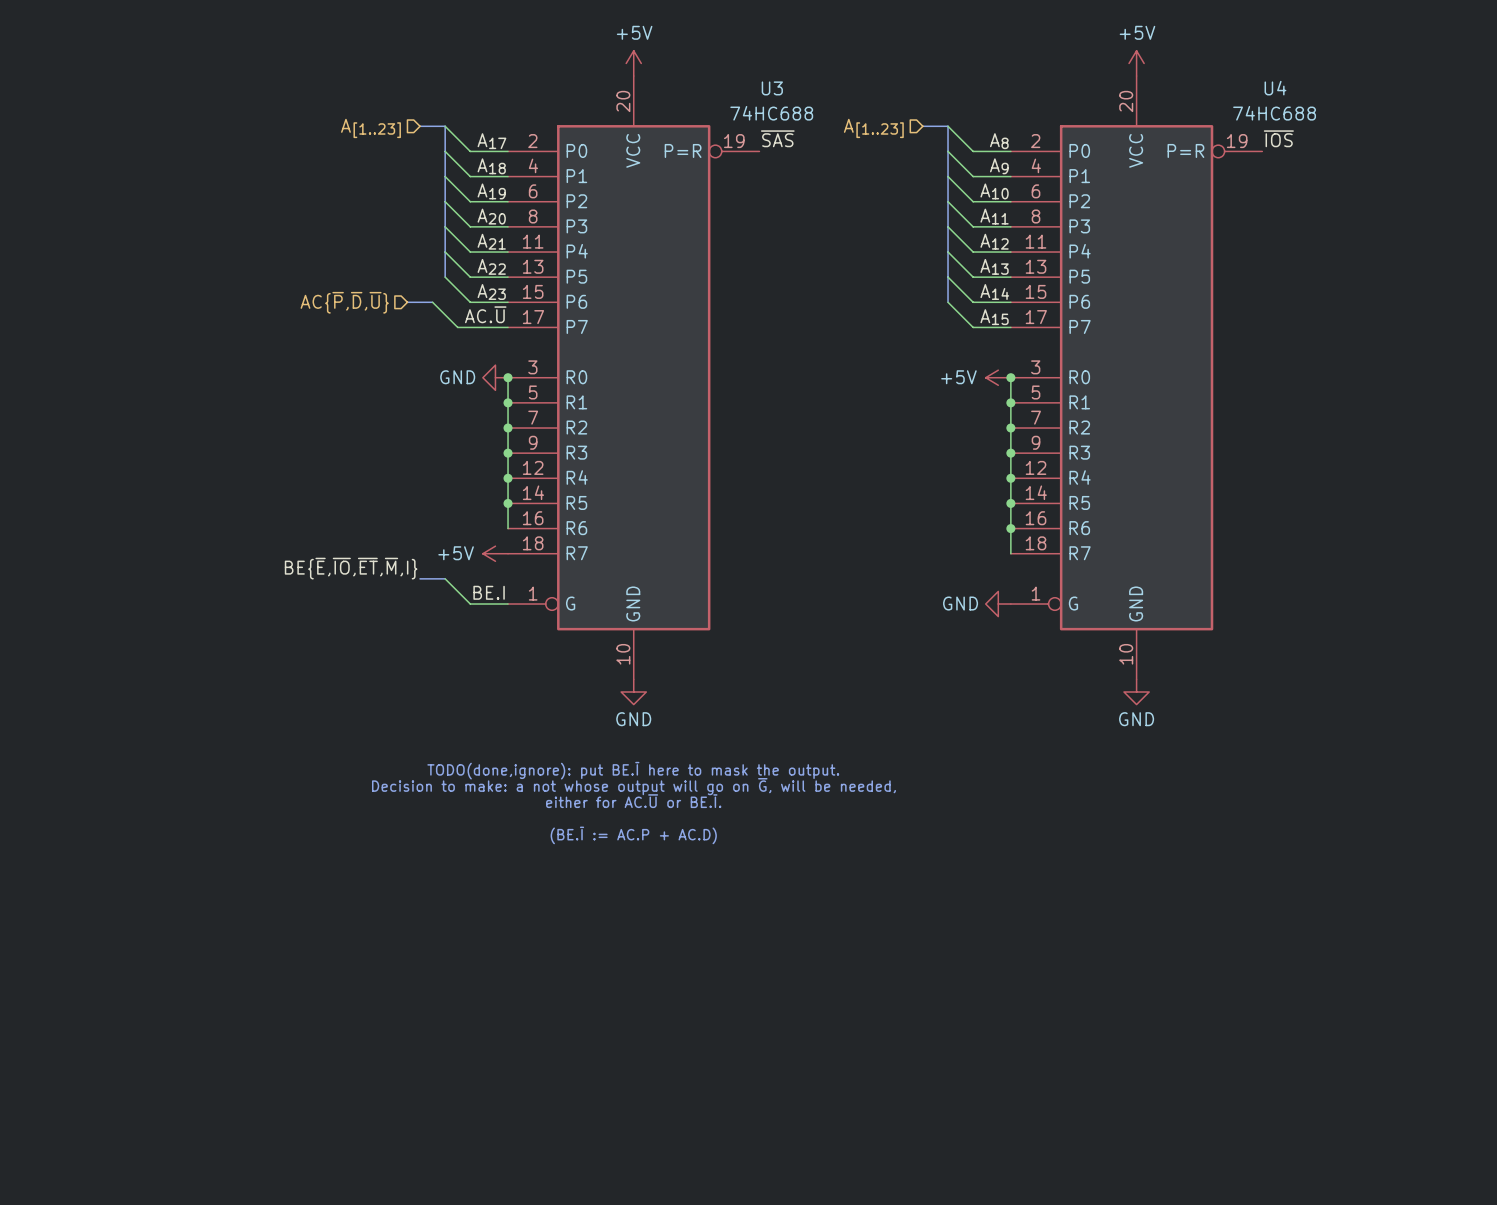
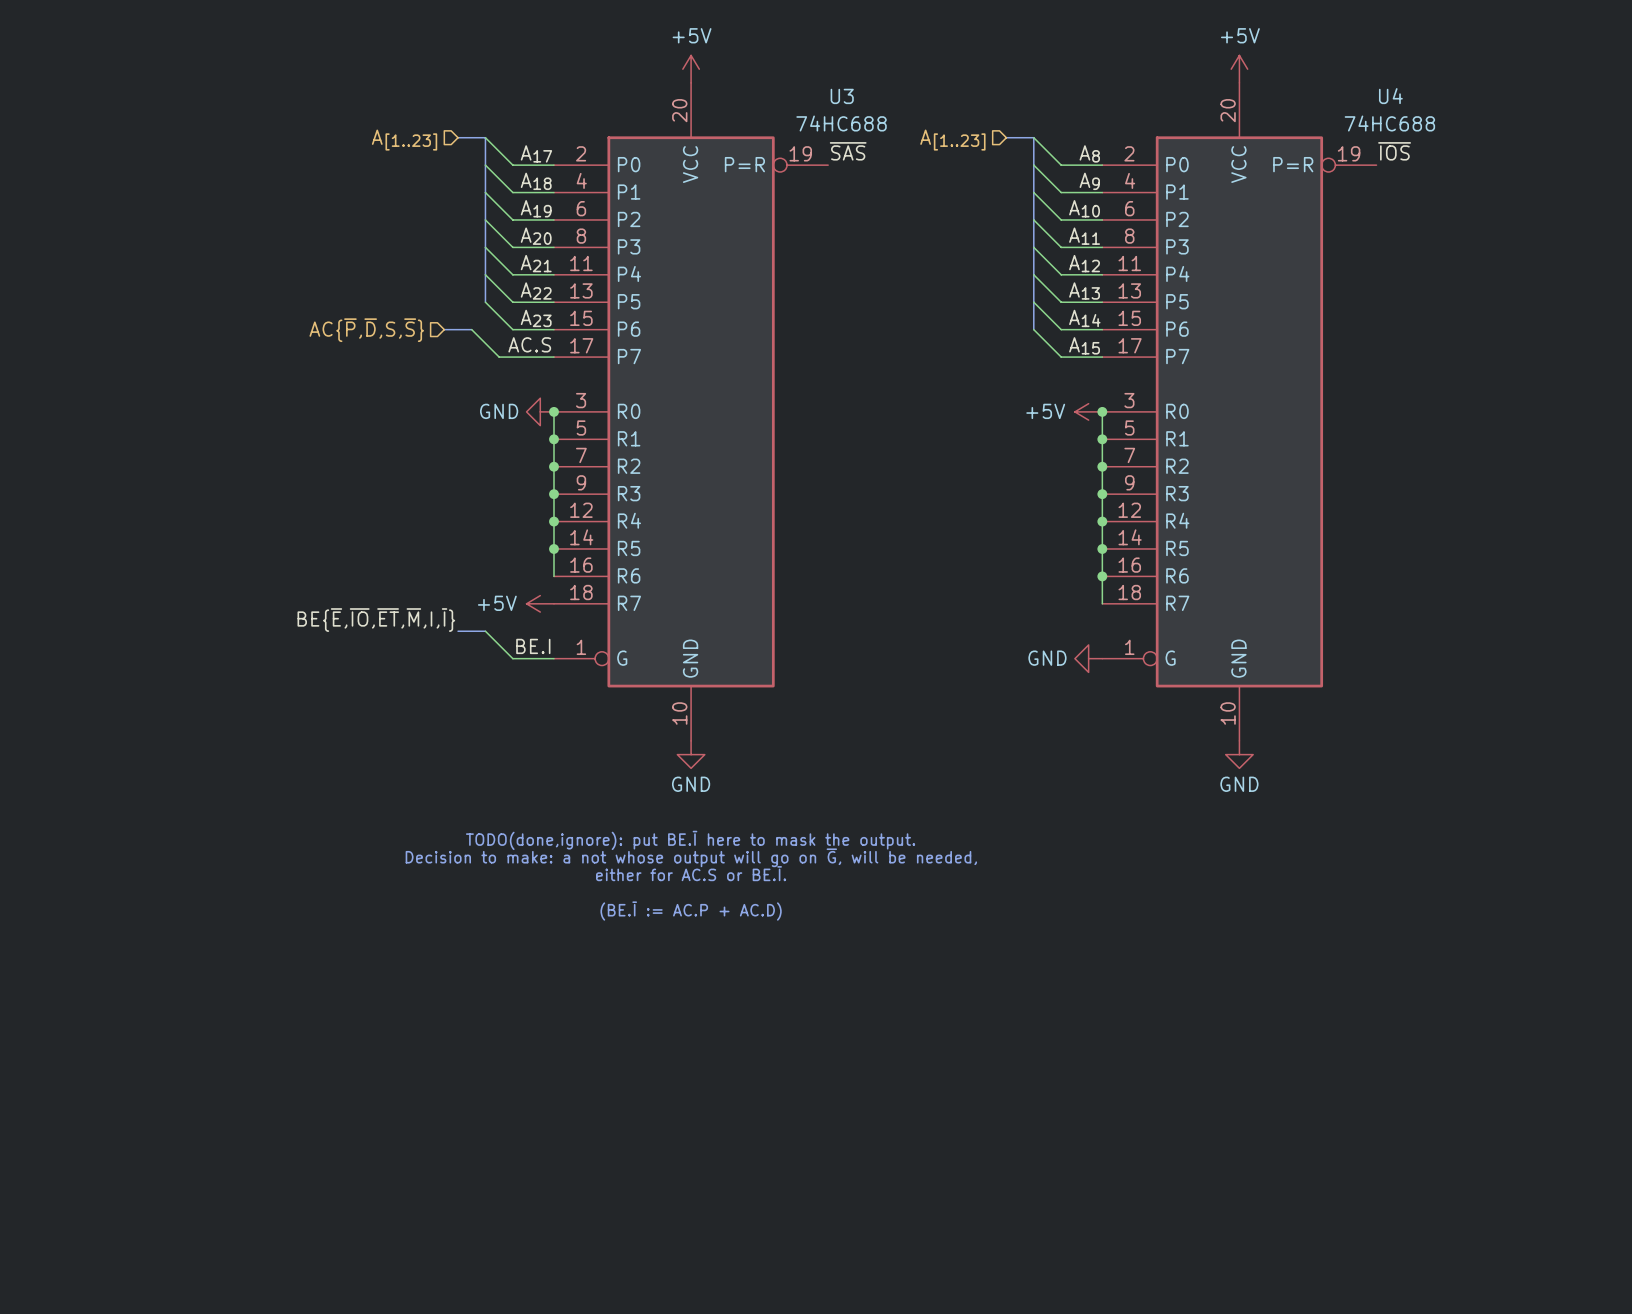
hierarchical label: AC{~{P},~{D},~{U}} (344, 302) -> AC{~{P},~{D},S,~{S}} (366, 330)
label: AC.~{U} (485, 314) -> AC.S (529, 344)
label: BE{~{E},~{IO},~{ET},~{M},I} (351, 568) -> BE{~{E},~{IO},~{ET},~{M},I,~{I}} (376, 620)
text: either for AC.~{U} or BE.~{I}. (633, 801) -> either for AC.S or BE.~{I}. (691, 873)

